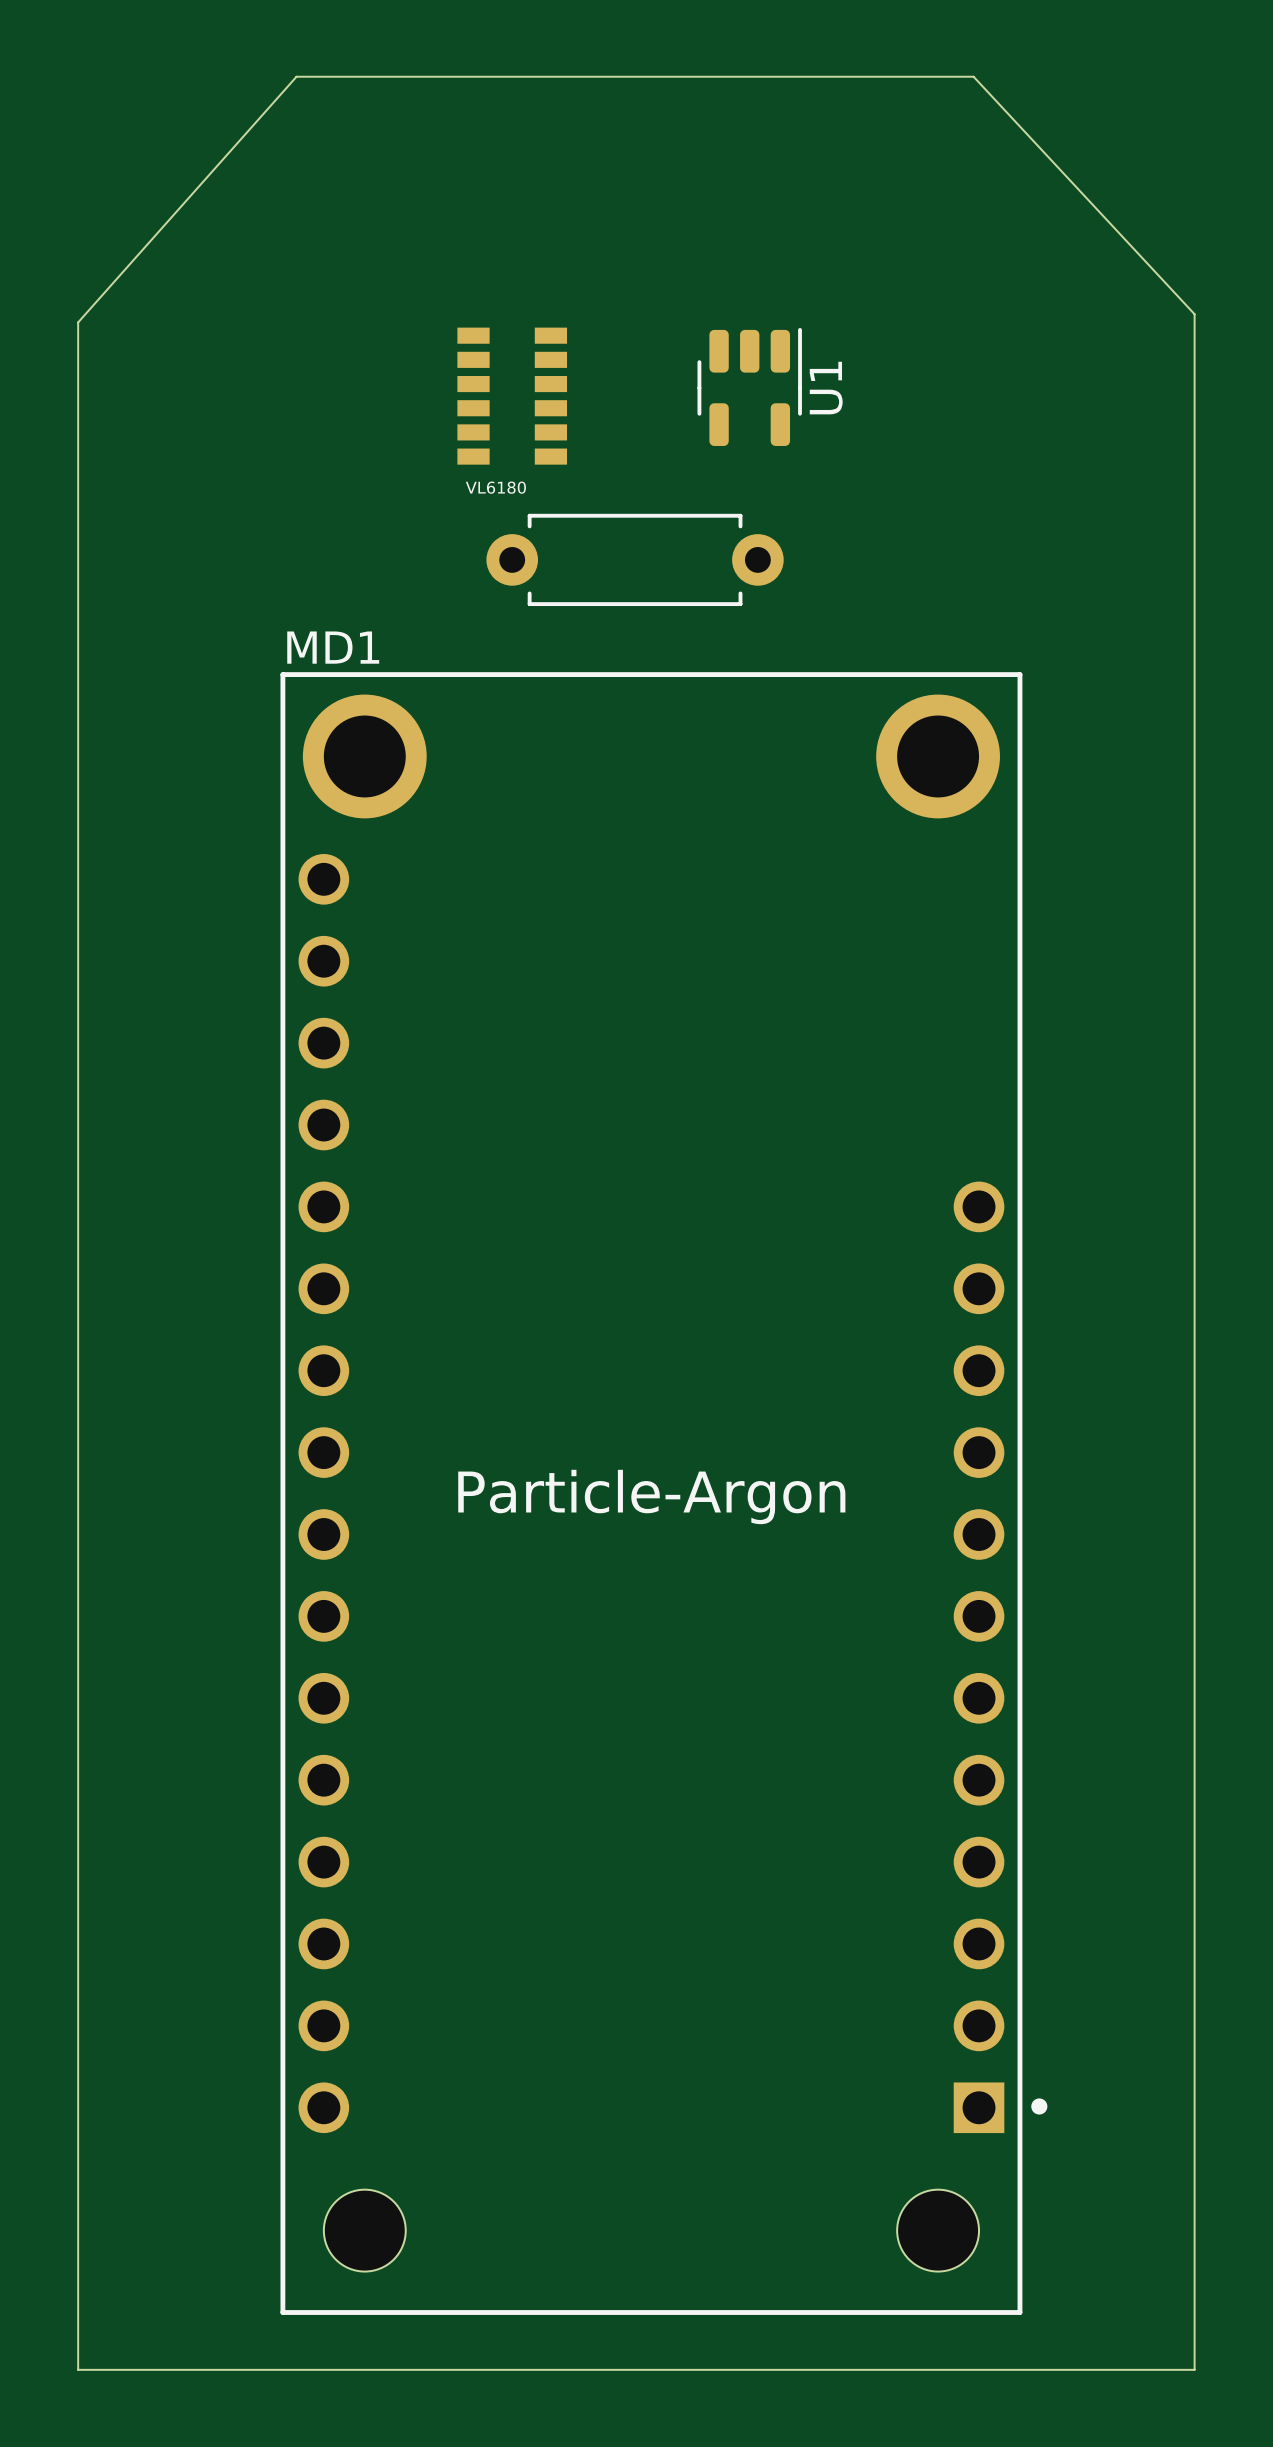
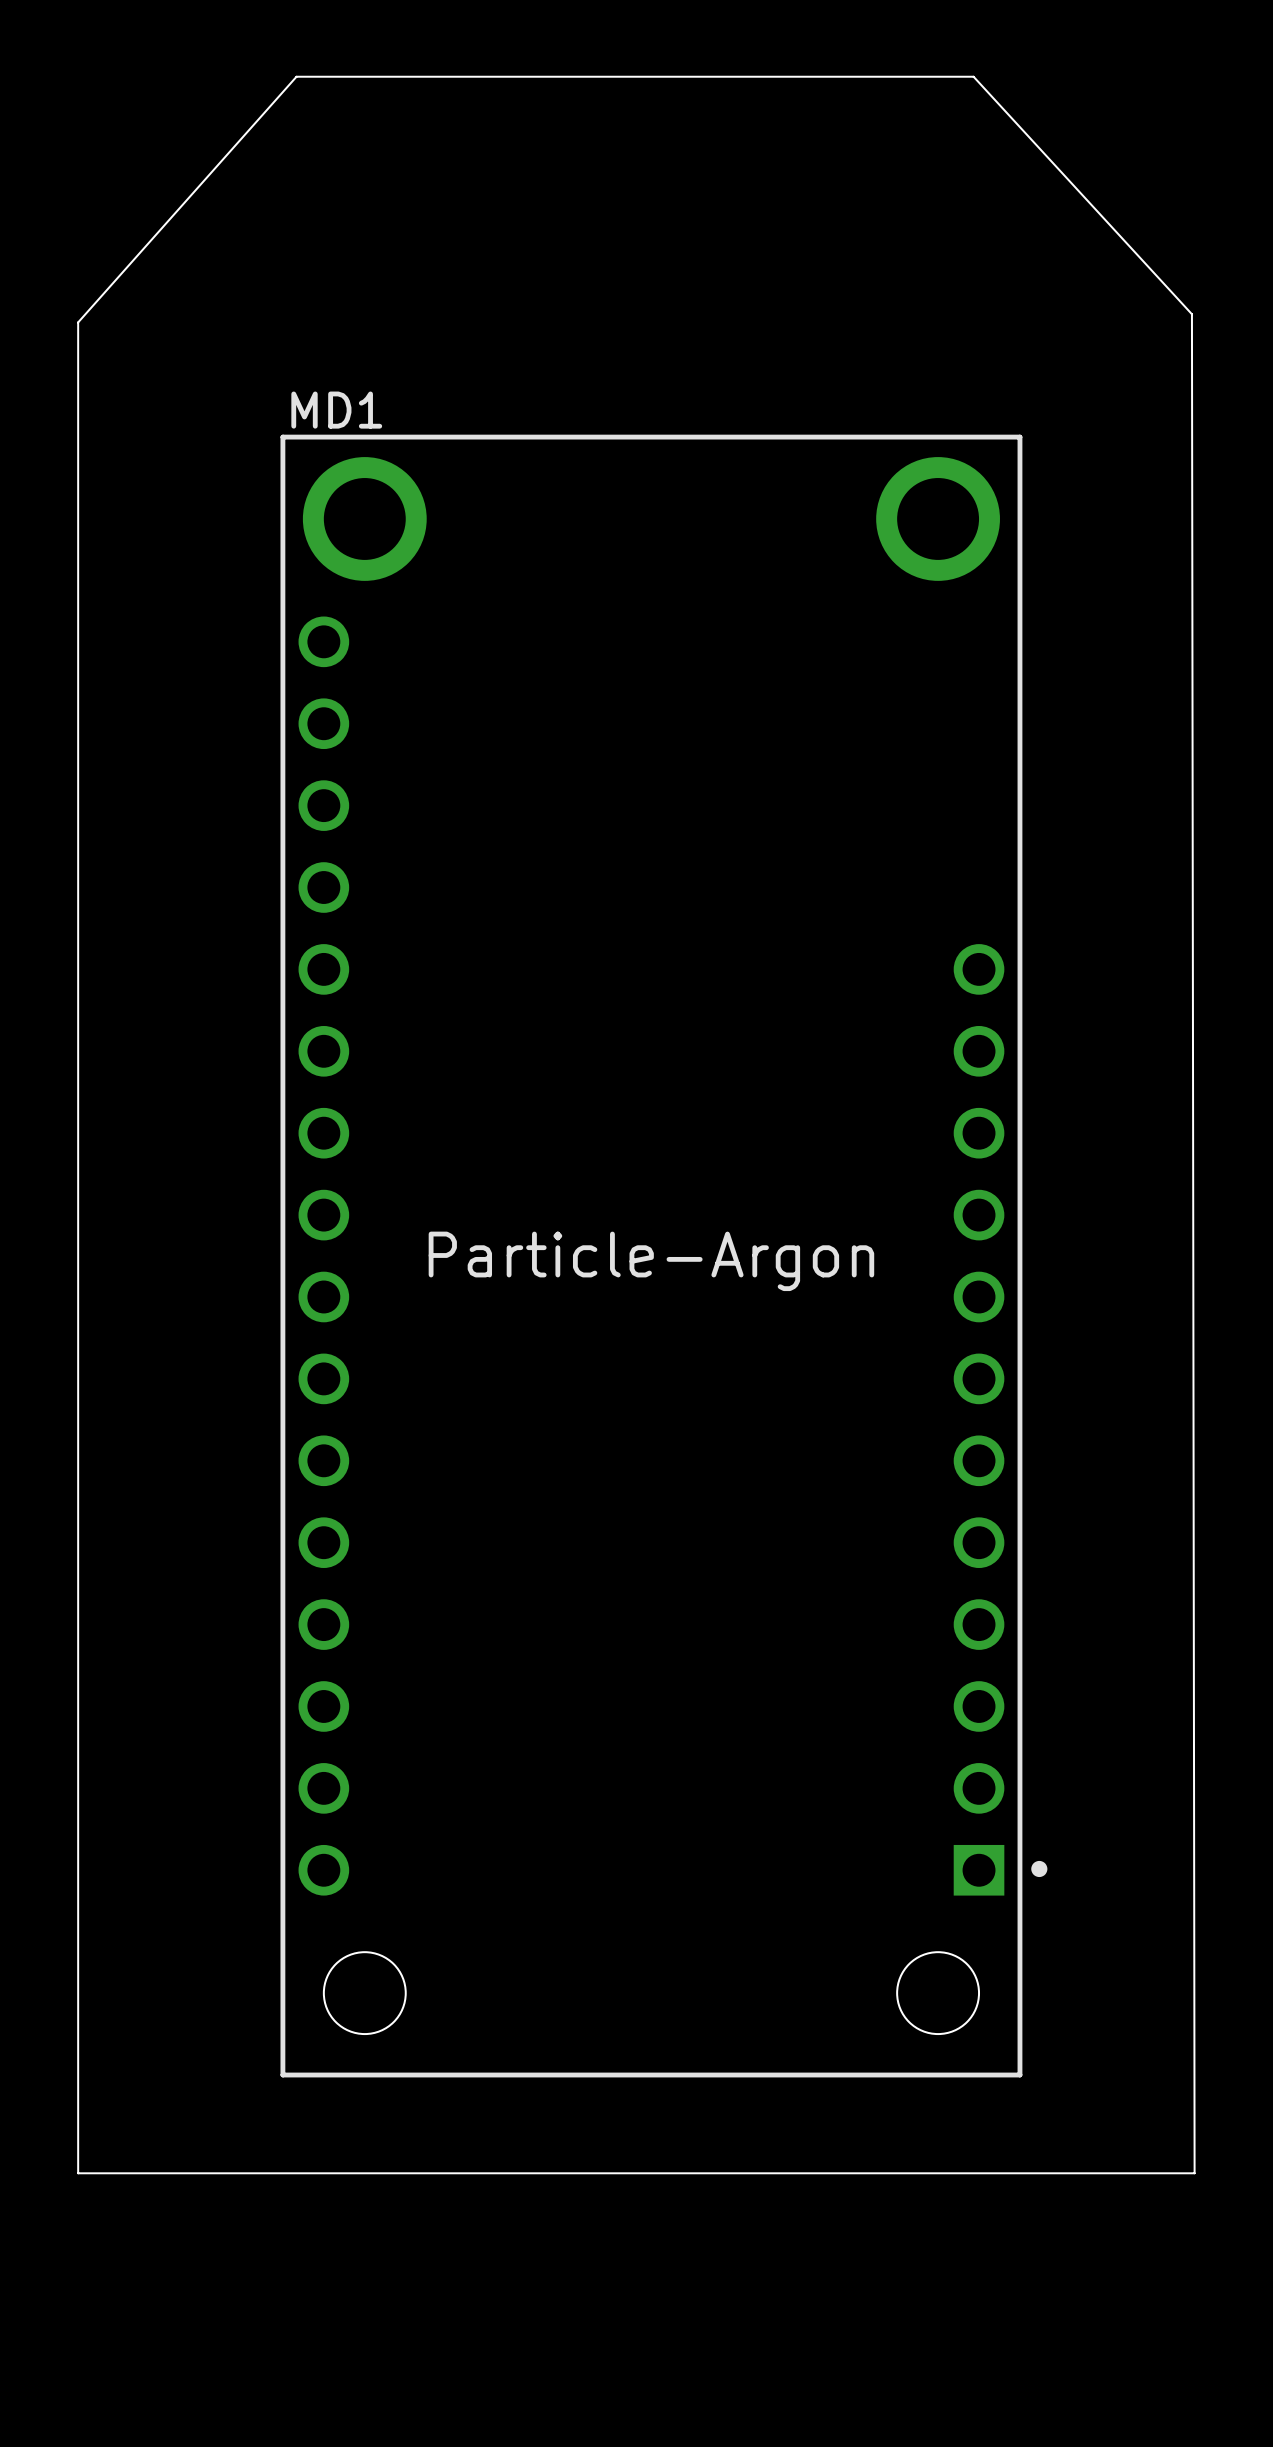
board edge: (973, 76) (1194, 314) (1194, 2369) (78, 2369) (78, 2173) -> (973, 76) (1191, 314) (1194, 2173) (78, 2173)
U1: (749, 386) -> none
part: VL6180 (512, 396) -> none
part: (635, 559) -> none
MD1 position: (663, 1493) -> (663, 1256)

